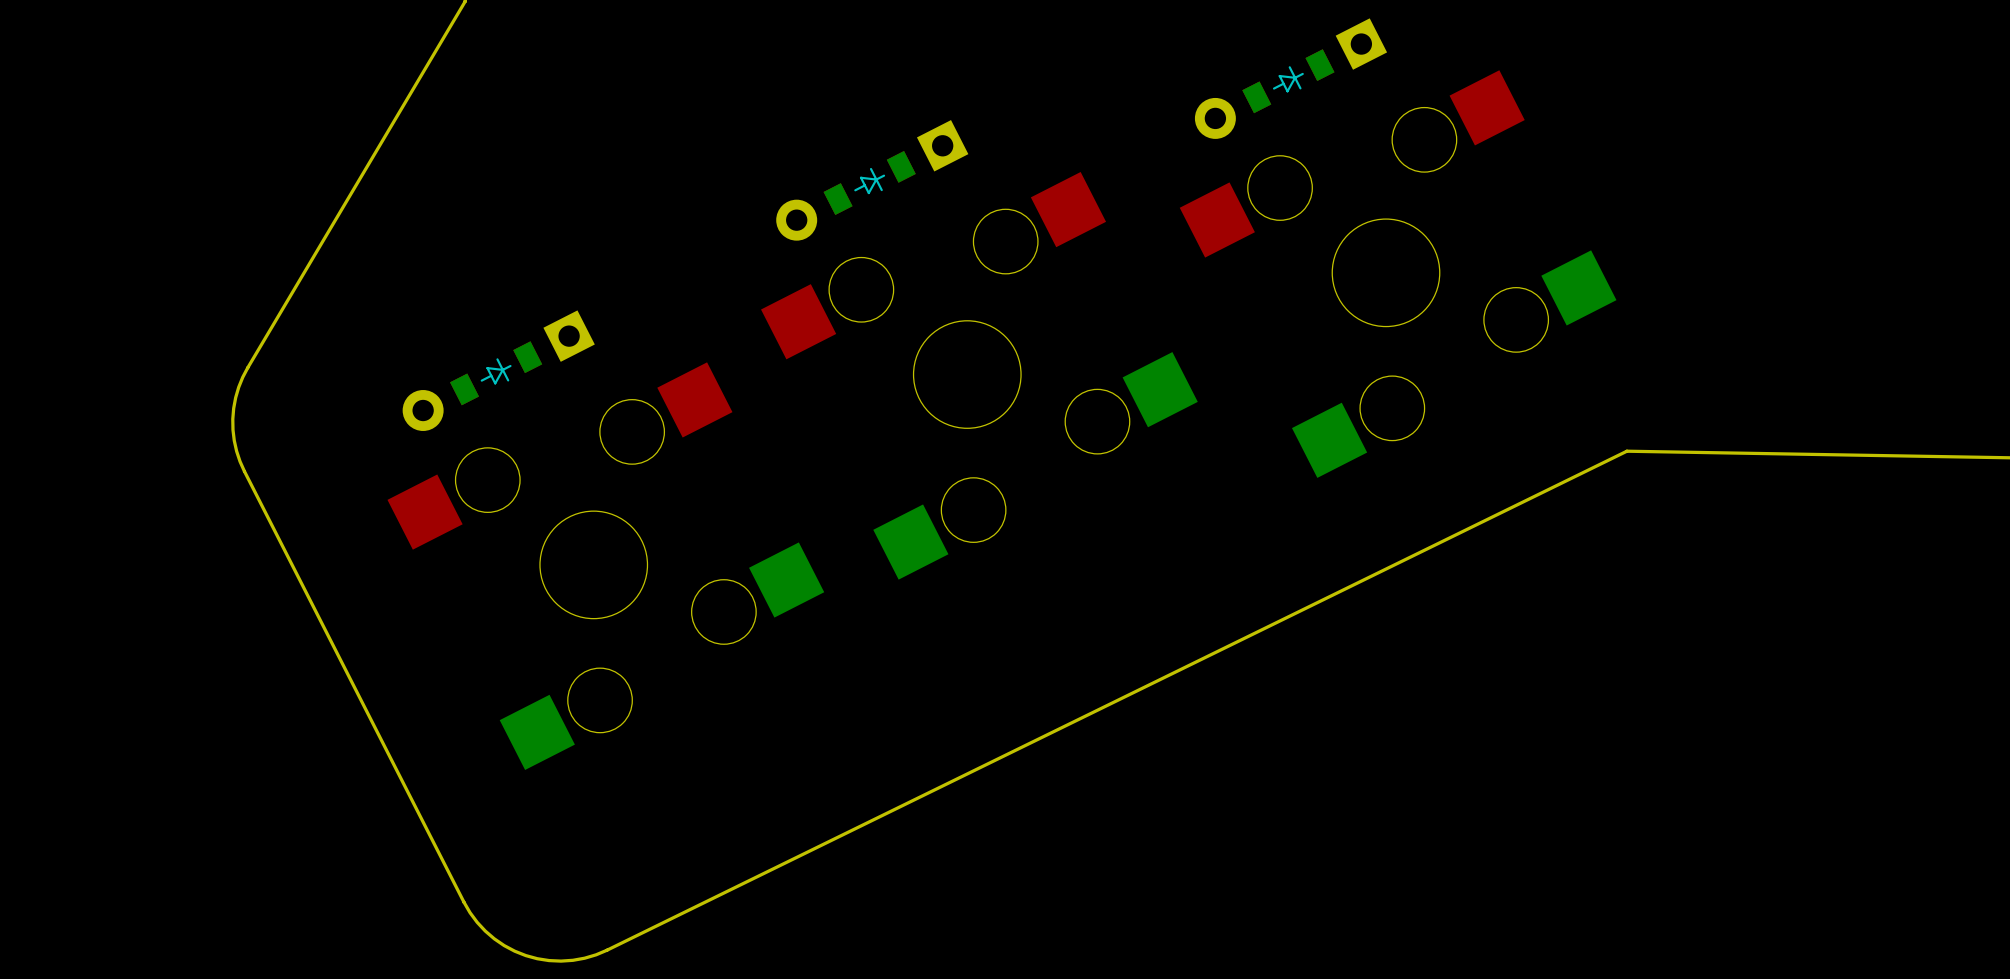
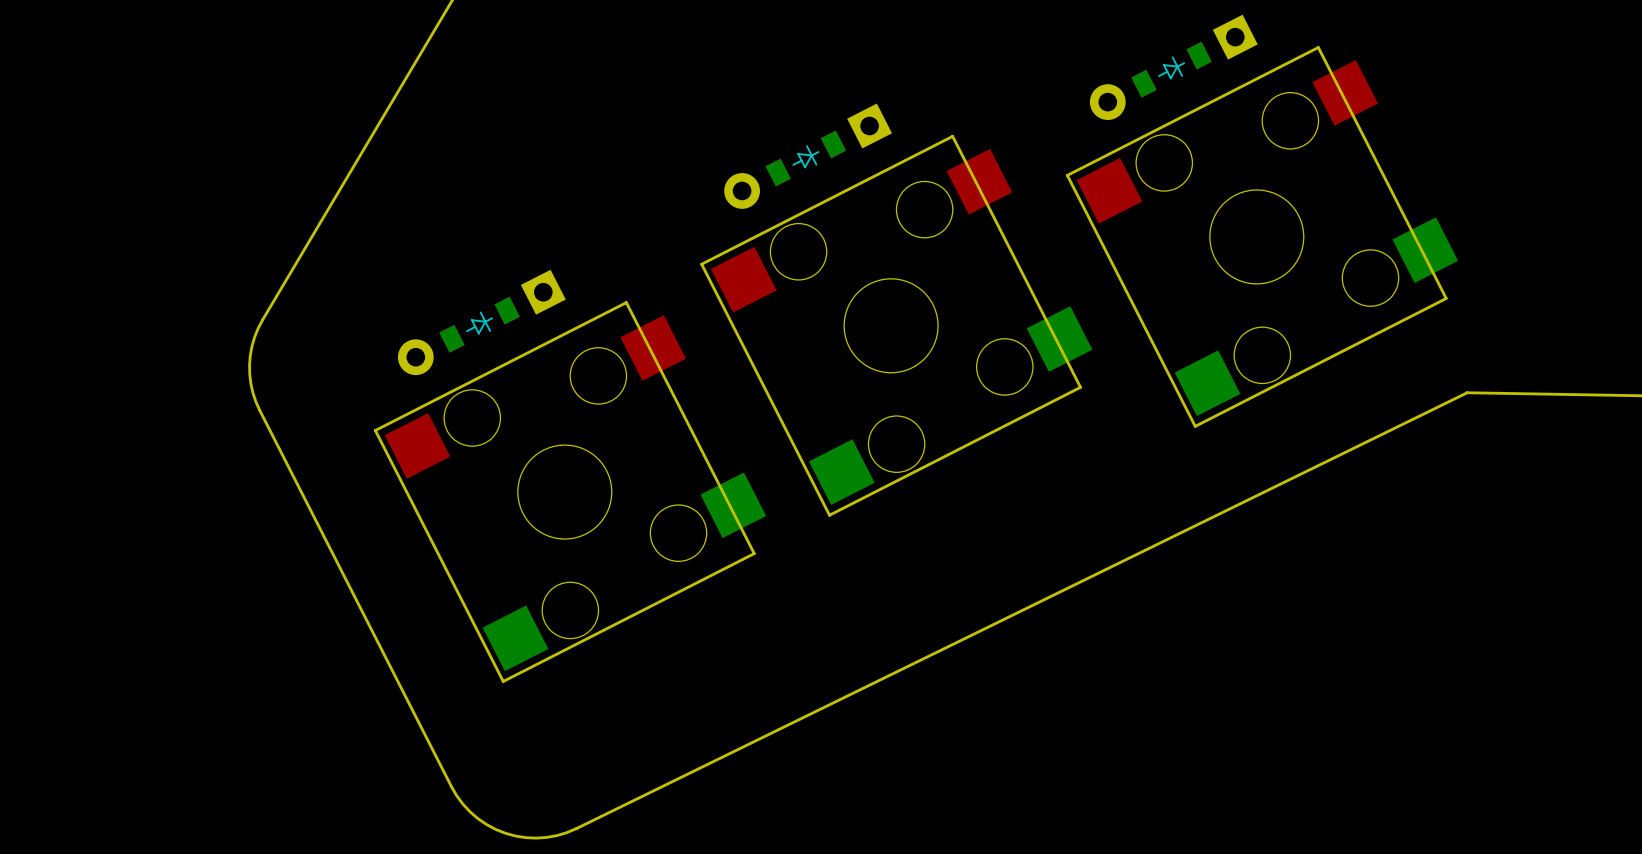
board edge: none -> (1318, 47) (1067, 175) (1195, 426) (1446, 298) (1318, 47)
board edge: none -> (952, 136) (701, 264) (829, 515) (1080, 387) (952, 136)
board edge: none -> (626, 302) (375, 430) (503, 681) (754, 553) (626, 302)

